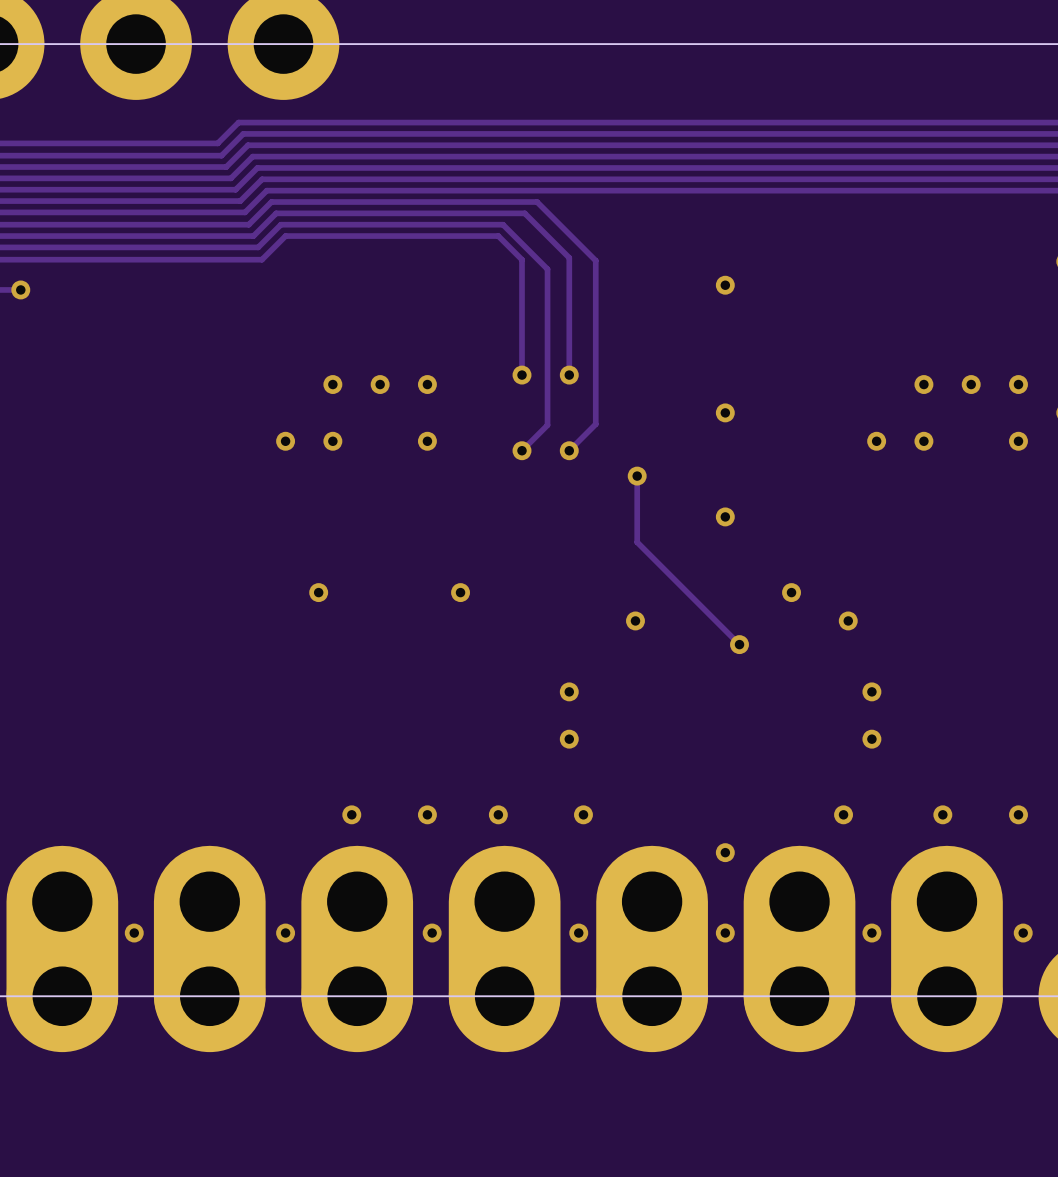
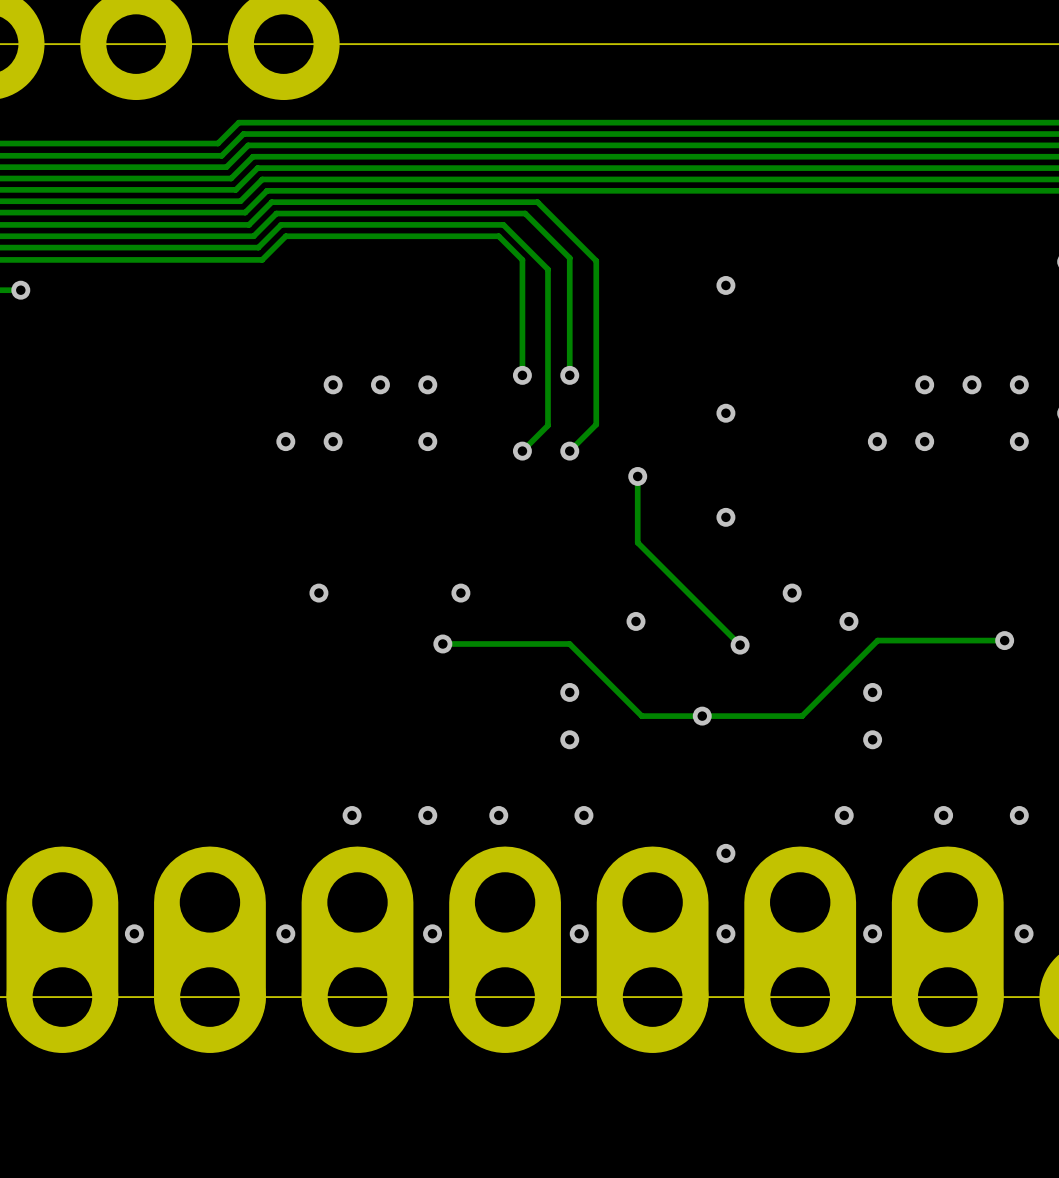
track: none -> (1004, 640) (877, 640) (802, 716) (641, 716) (569, 643) (442, 643)
via: none -> (1004, 640)
via: none -> (442, 643)
via: none -> (702, 716)

